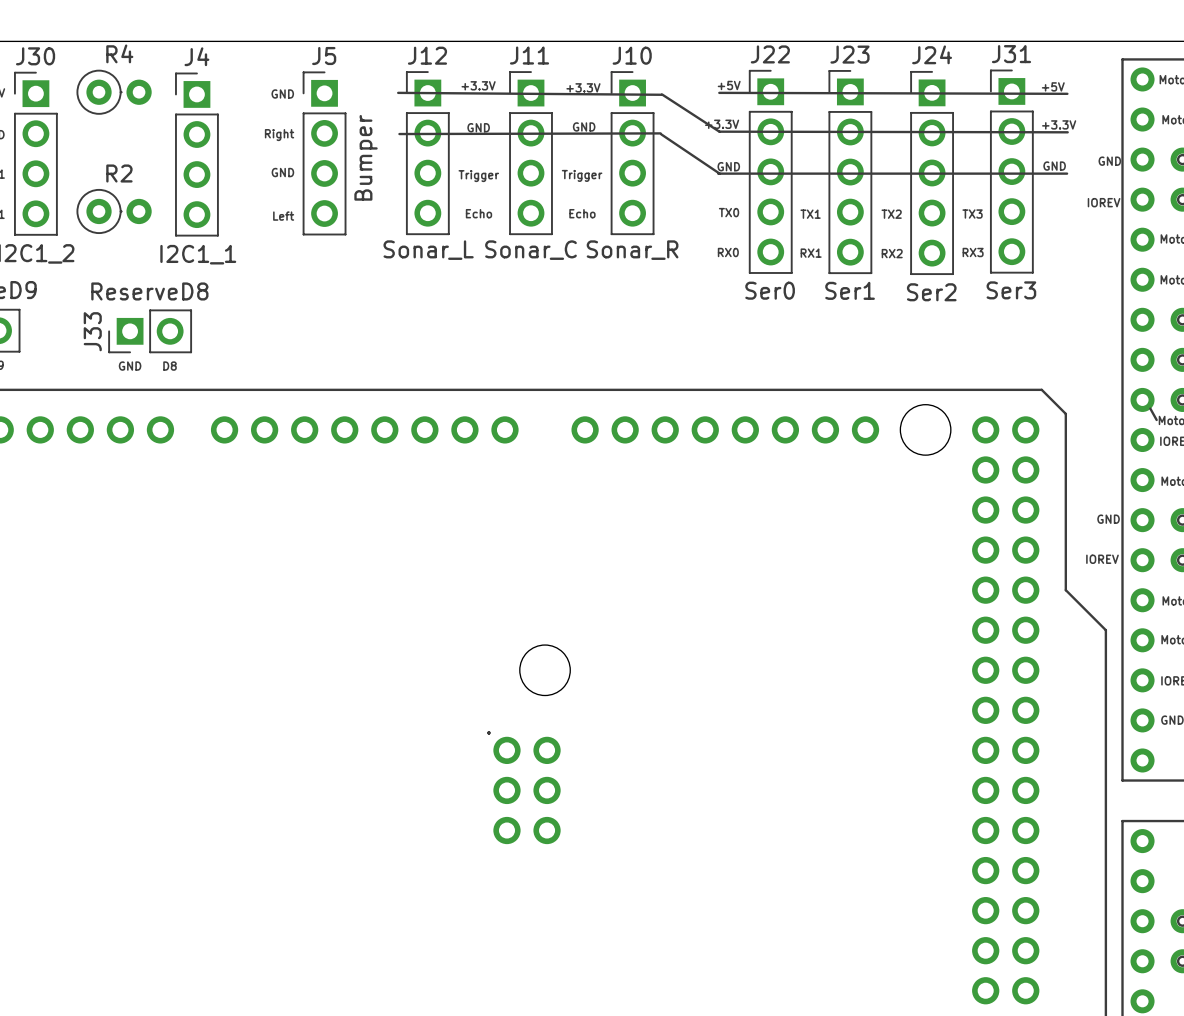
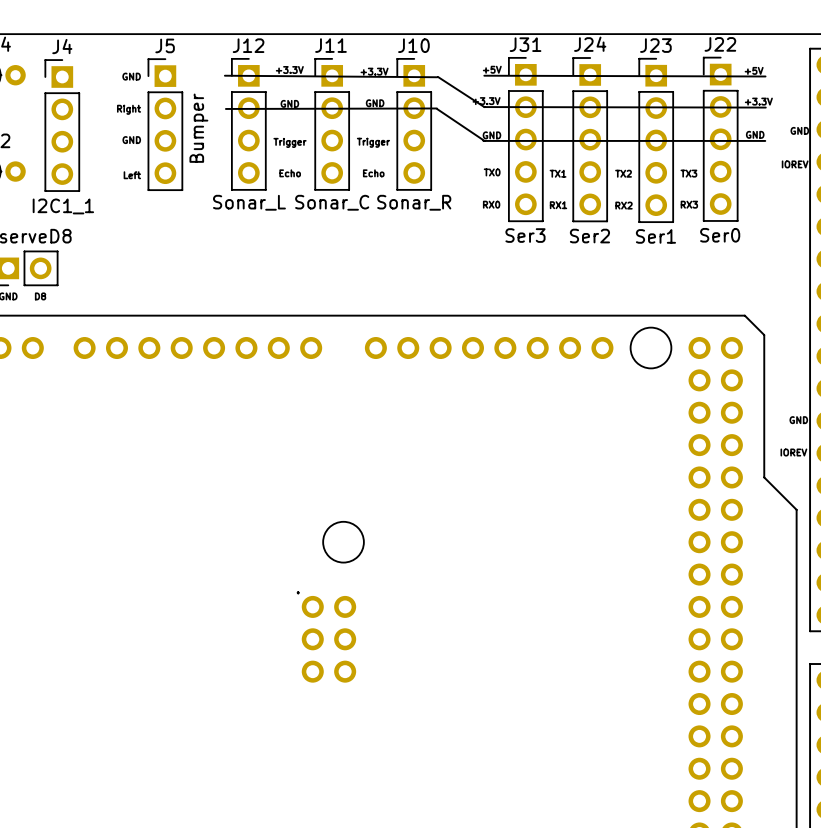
J22 name: J22 (770, 54) -> J31 (525, 44)
J23 name: J23 (850, 54) -> J24 (590, 44)
J24 name: J24 (932, 54) -> J23 (655, 45)
J31 name: J31 (1011, 54) -> J22 (720, 44)
J22 value: Ser0 (770, 290) -> Ser3 (525, 235)
J23 value: Ser1 (850, 290) -> Ser2 (589, 236)
J31 value: Ser3 (1011, 290) -> Ser0 (720, 235)
J24 value: Ser2 (931, 292) -> Ser1 (655, 236)

